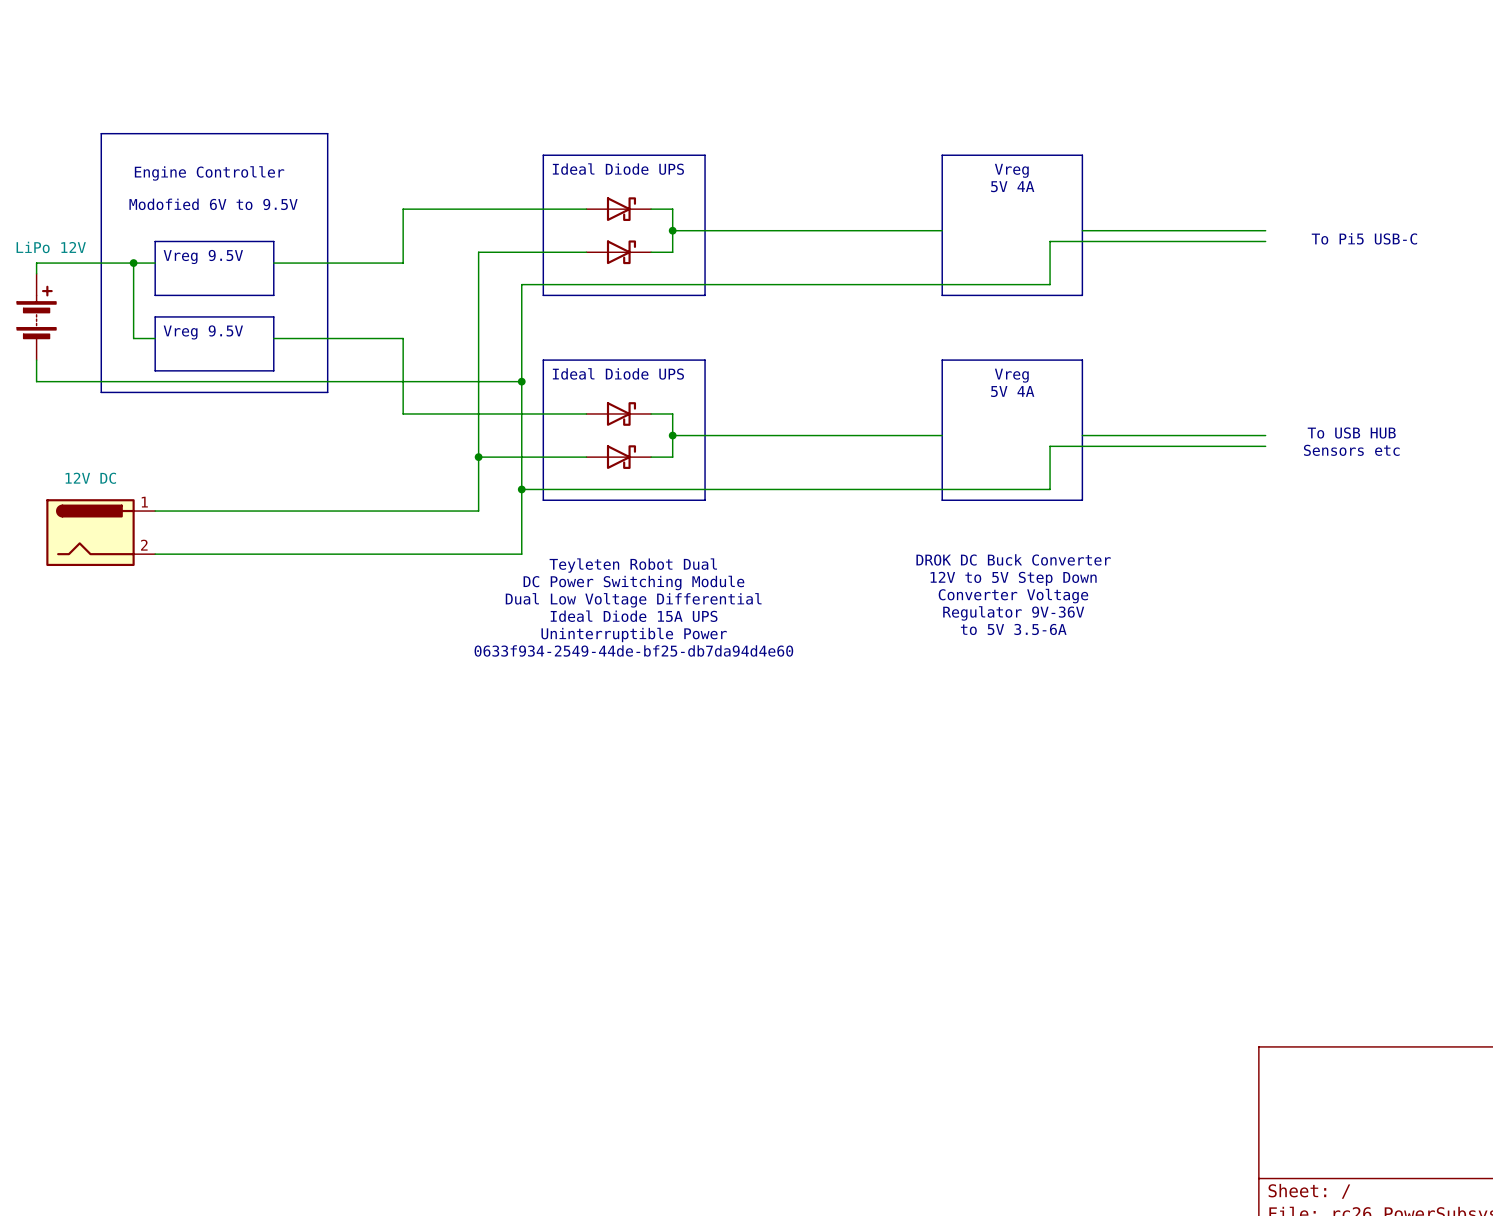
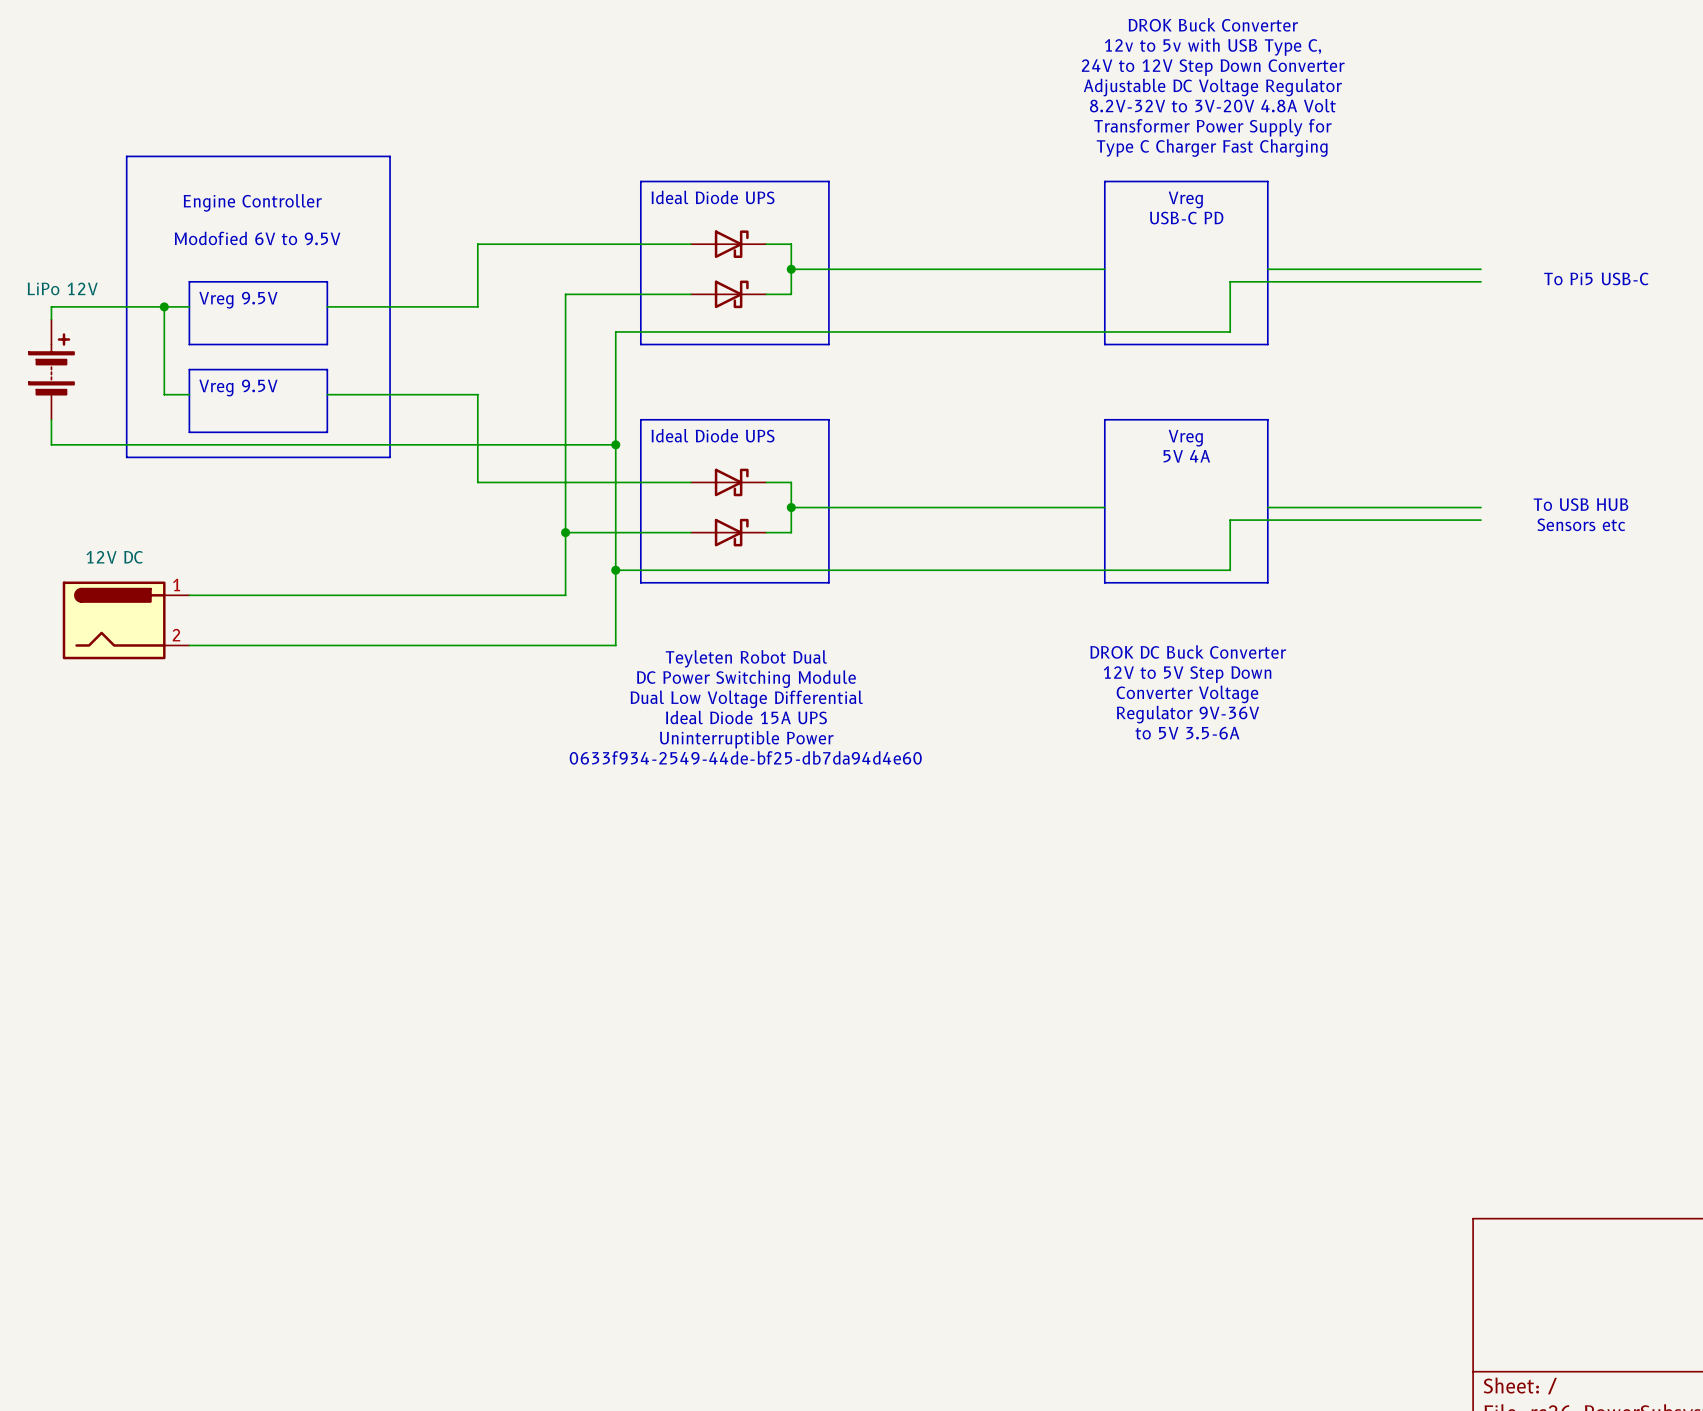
text: none -> DROK Buck Converter (1213, 24)
text: none -> 12v to 5v with USB Type C, (1213, 47)
text: none -> 24V to 12V Step Down Converter (1213, 67)
text: none -> Adjustable DC Voltage Regulator (1212, 87)
text: none -> 8.2V-32V to 3V-20V 4.8A Volt (1212, 105)
text: none -> Transformer Power Supply for (1212, 127)
text: none -> Type C Charger Fast Charging (1212, 148)
text: 5V 4A (1012, 186) -> USB-C PD (1186, 218)

